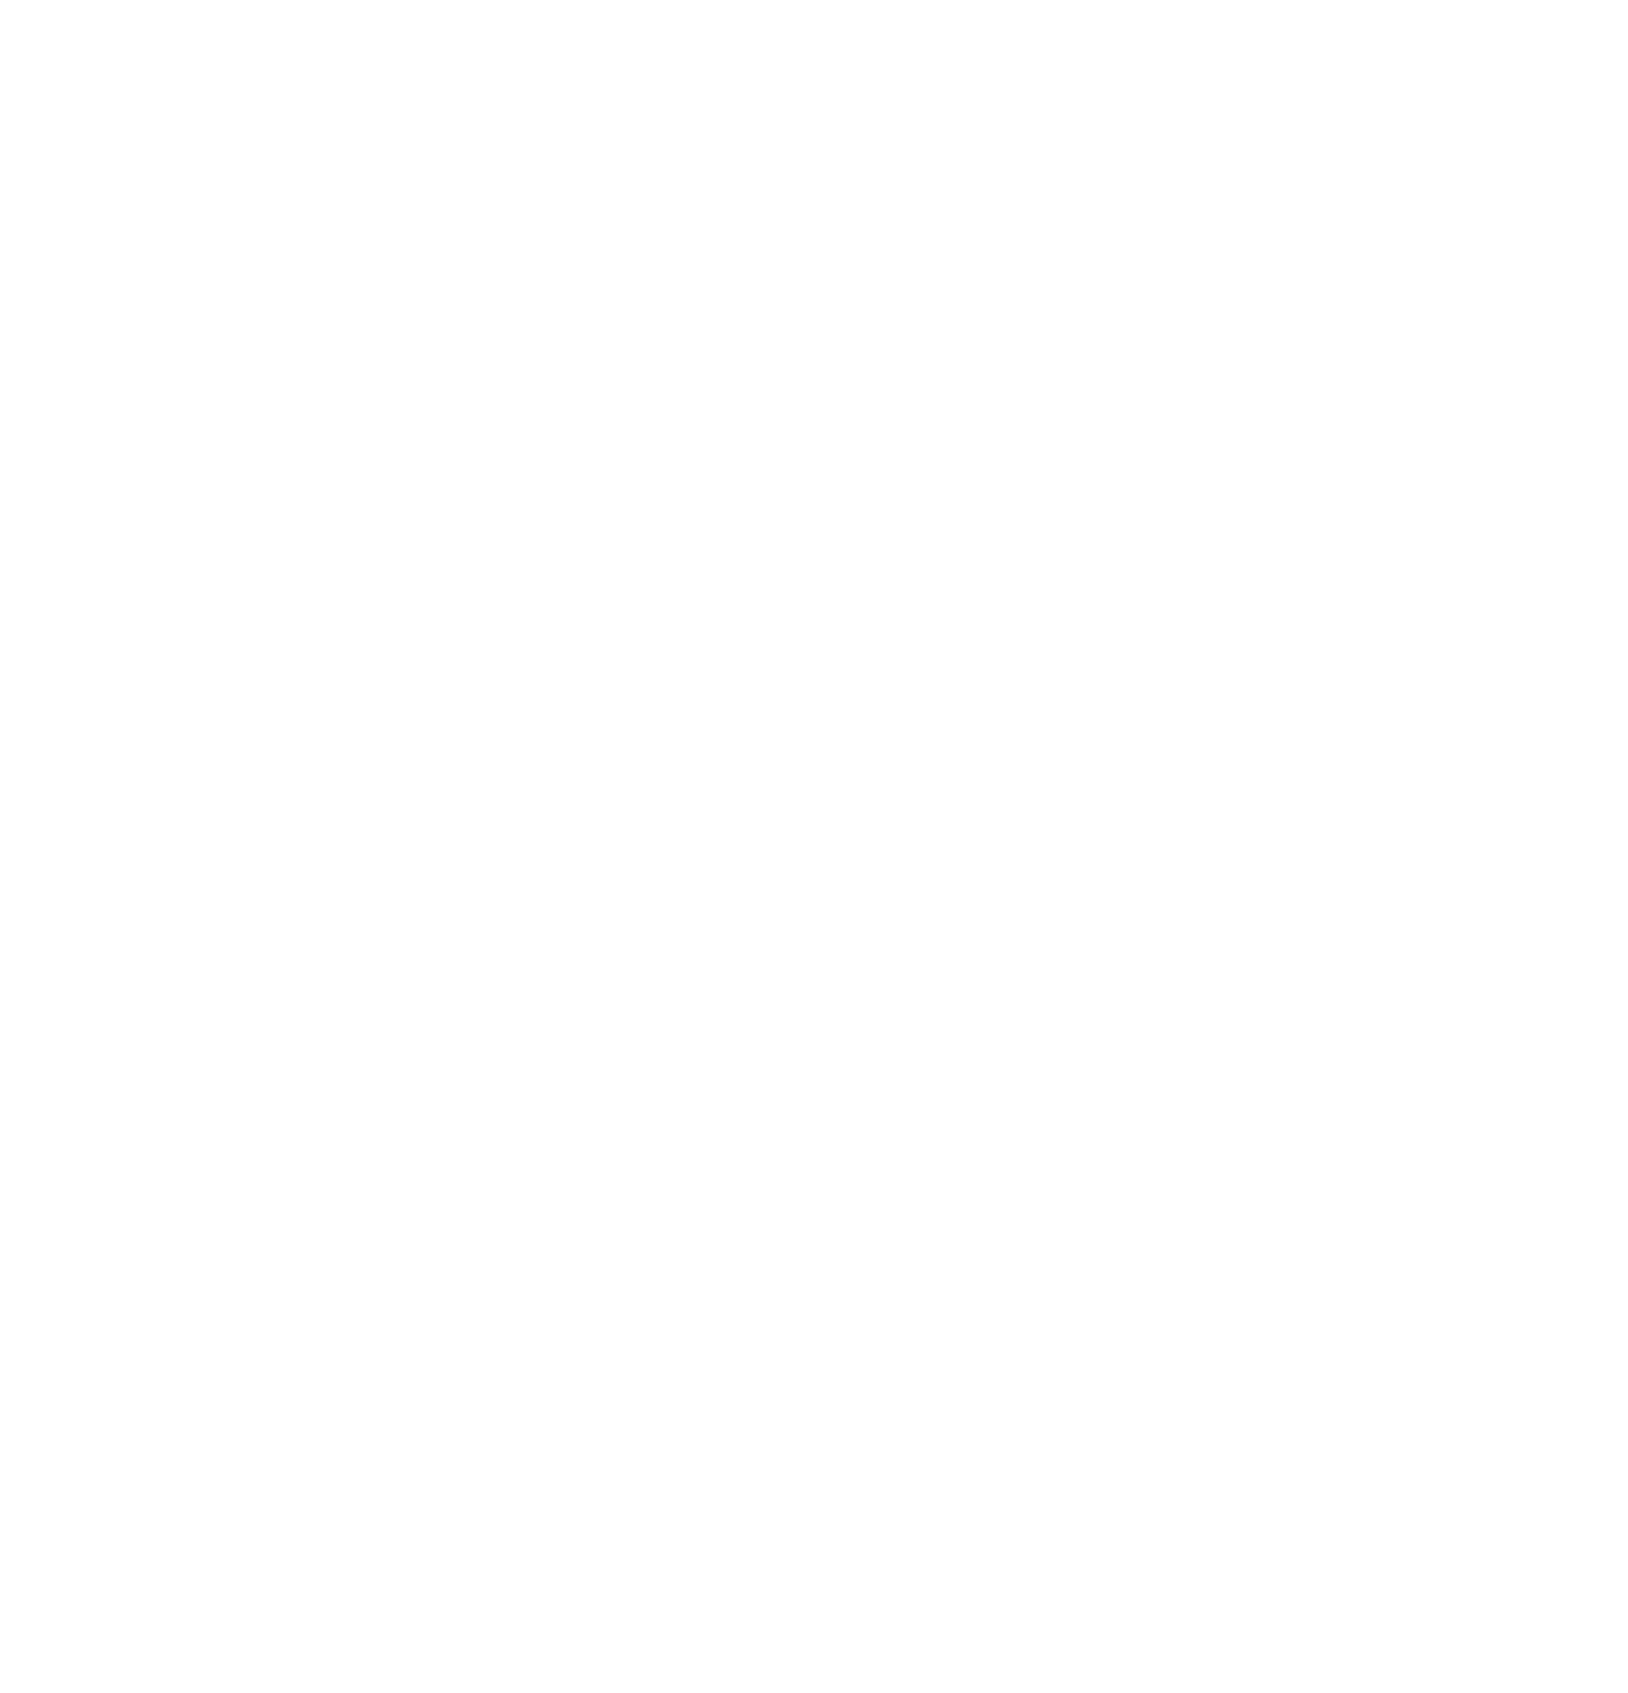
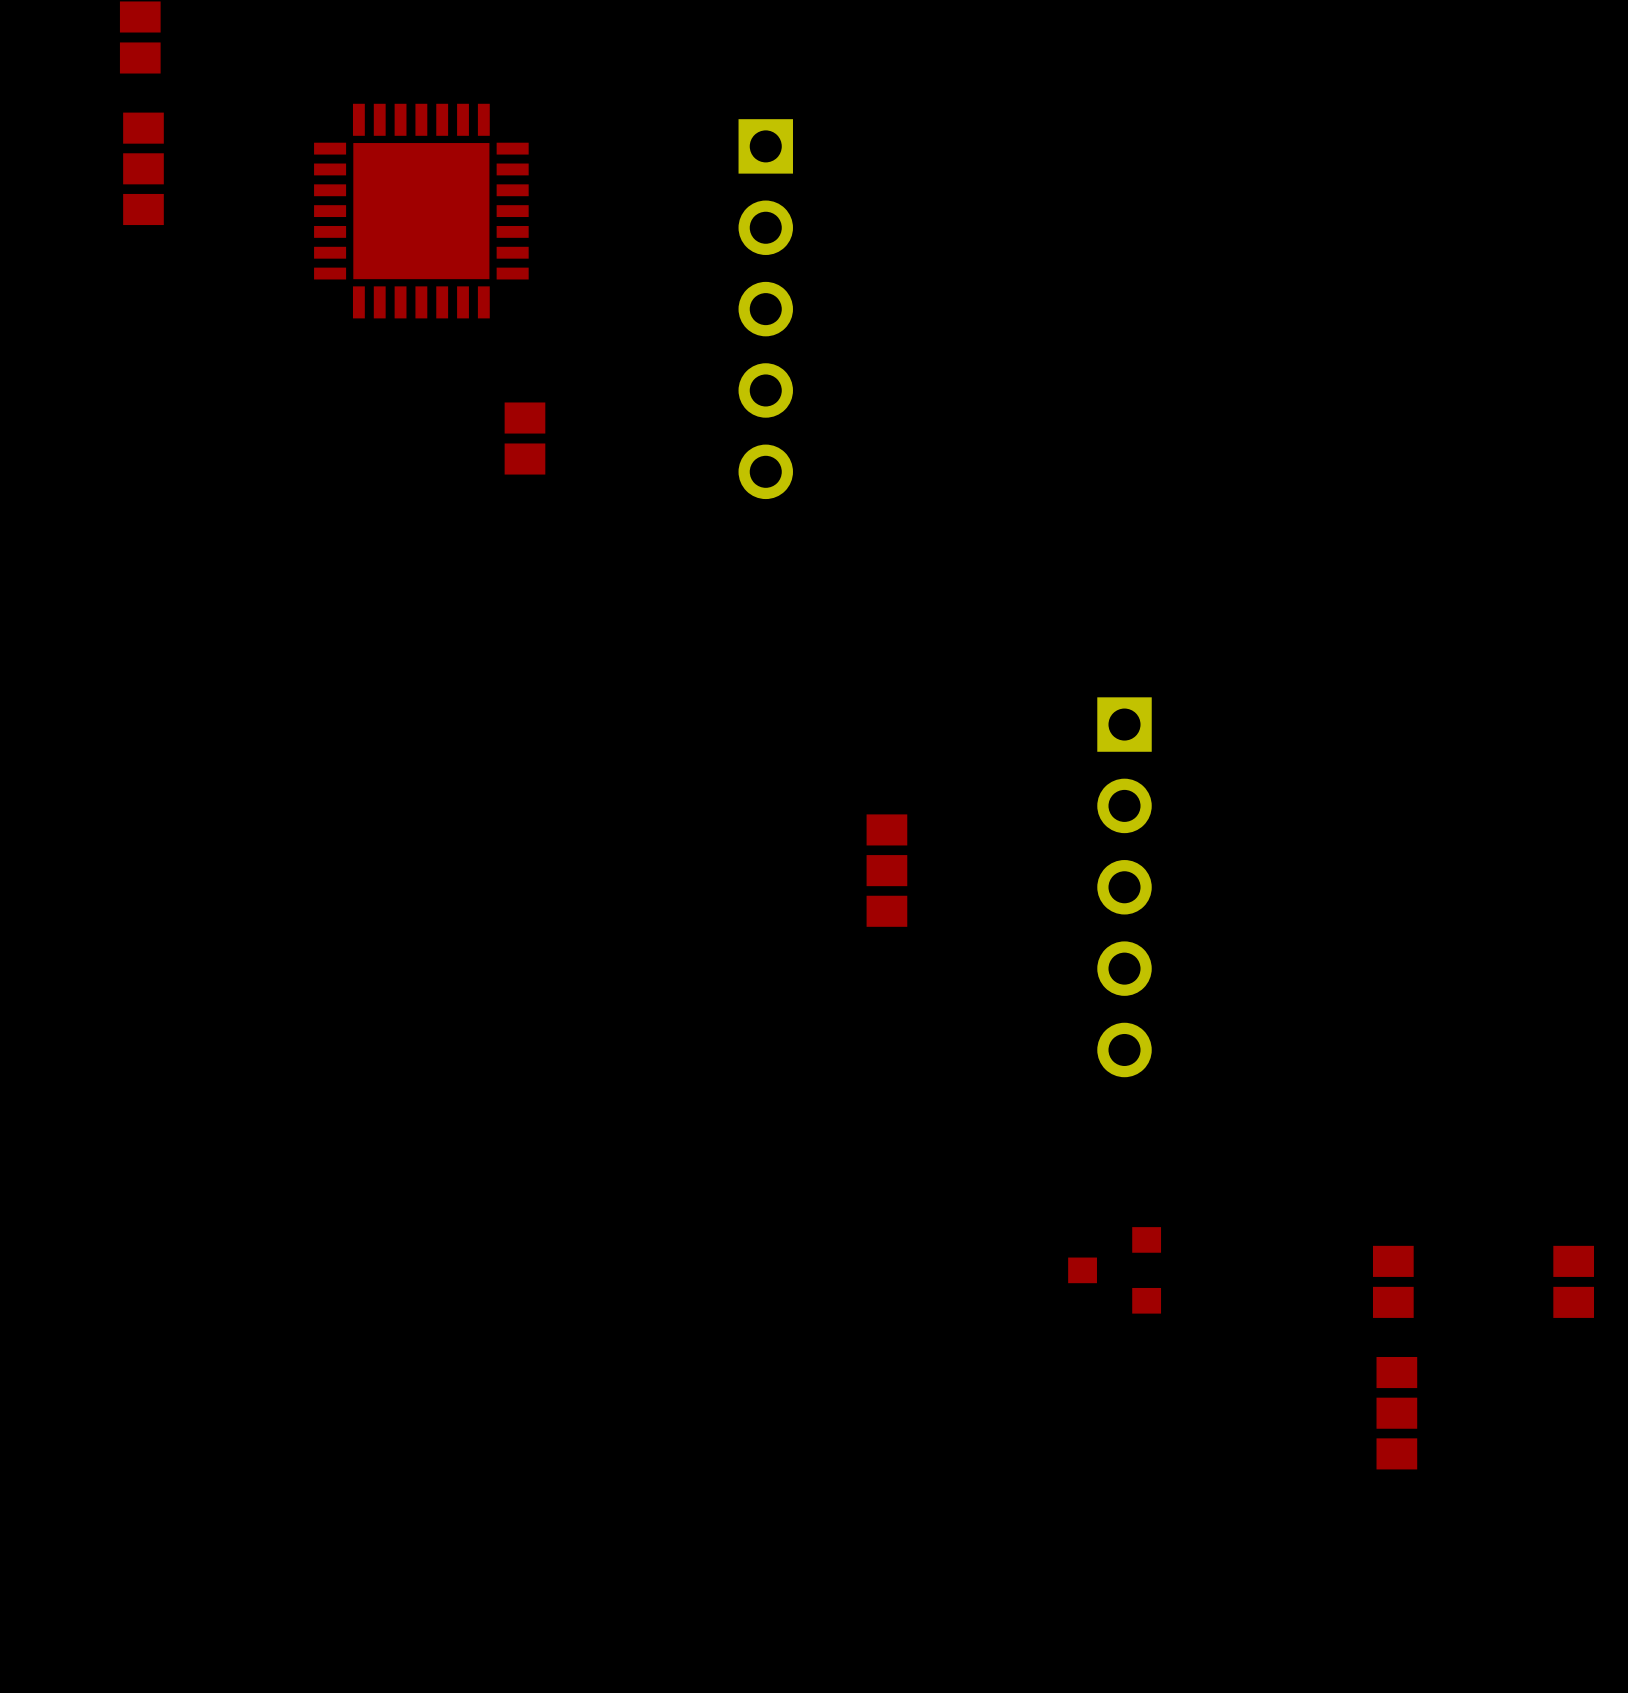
part: none -> (140, 37)
part: none -> (143, 168)
part: none -> (421, 211)
part: none -> (765, 309)
part: none -> (524, 438)
part: none -> (886, 870)
part: none -> (1124, 887)
part: none -> (1114, 1270)
part: none -> (1393, 1281)
part: none -> (1573, 1281)
part: none -> (1396, 1413)

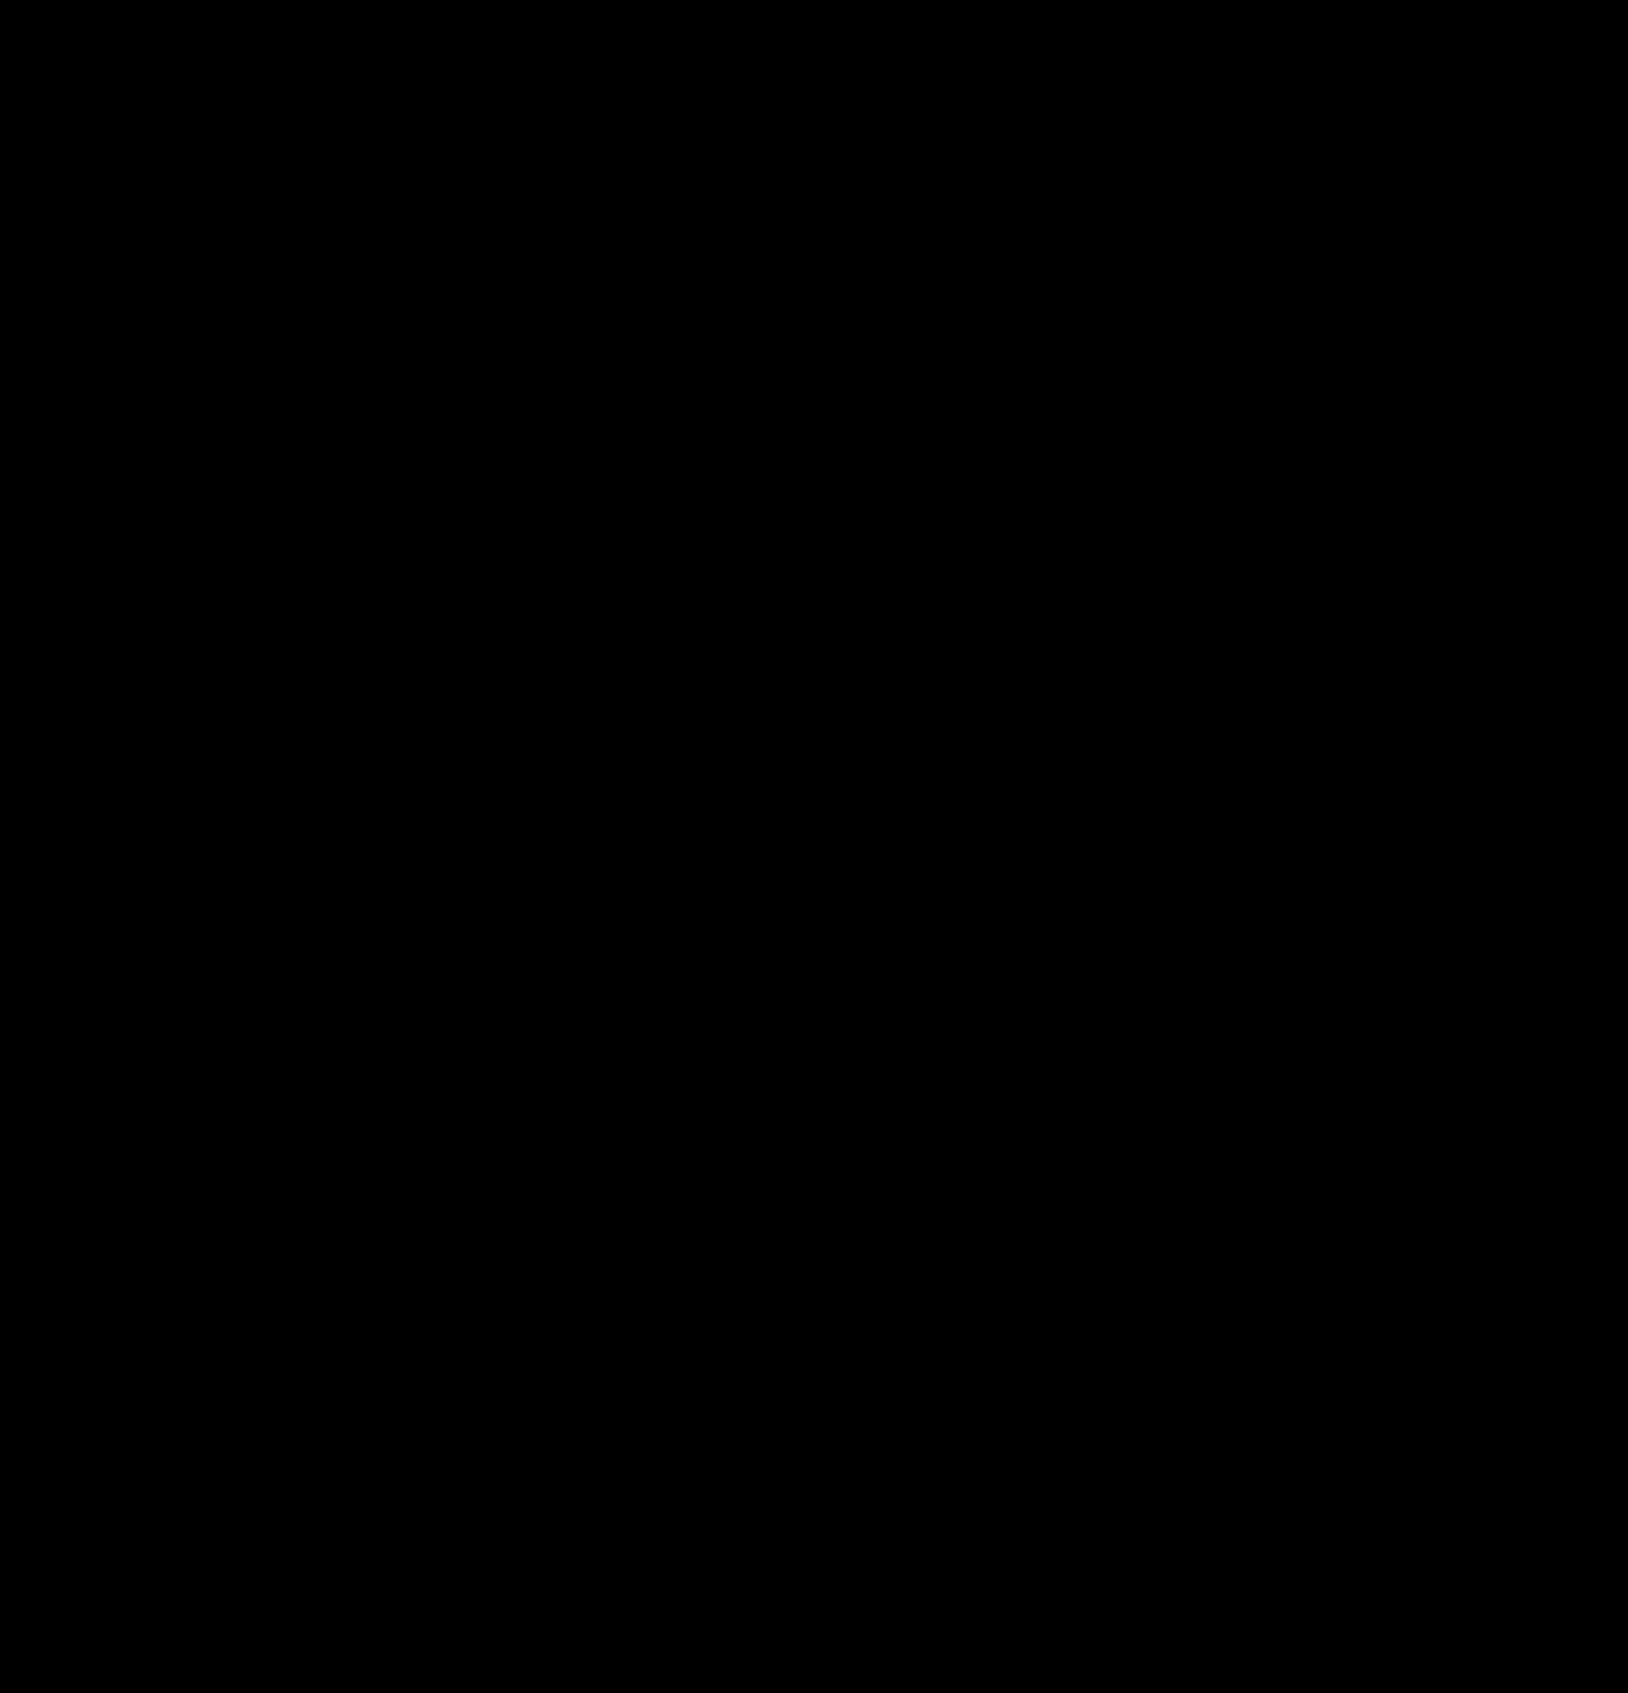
part: (140, 37) -> none
part: (143, 168) -> none
part: (421, 211) -> none
part: (765, 309) -> none
part: (524, 438) -> none
part: (886, 870) -> none
part: (1124, 887) -> none
part: (1114, 1270) -> none
part: (1393, 1281) -> none
part: (1573, 1281) -> none
part: (1396, 1413) -> none

